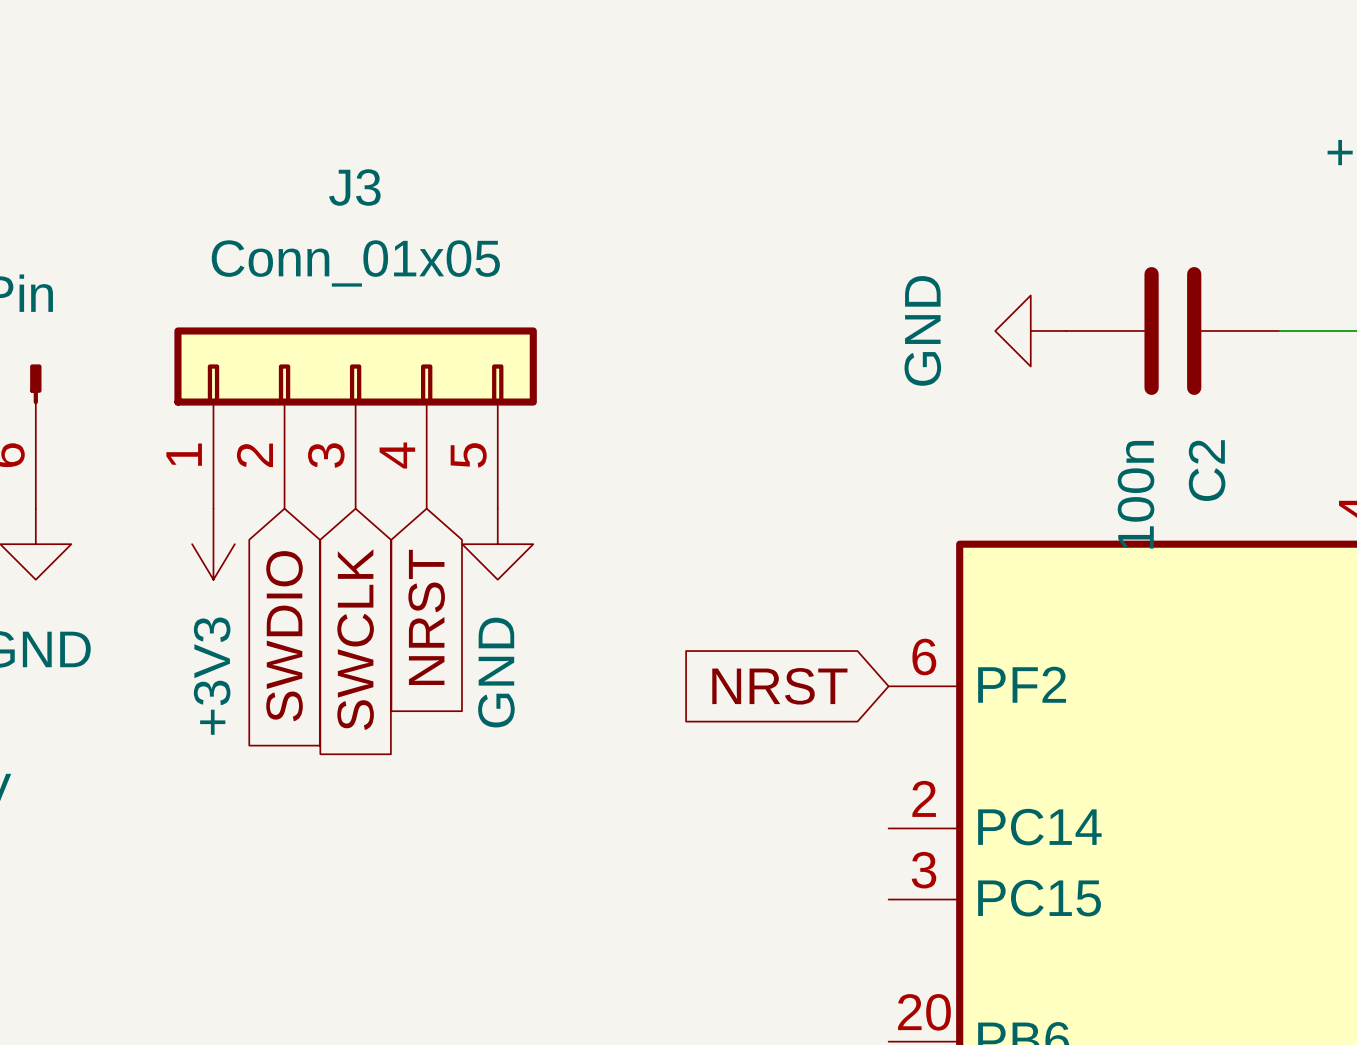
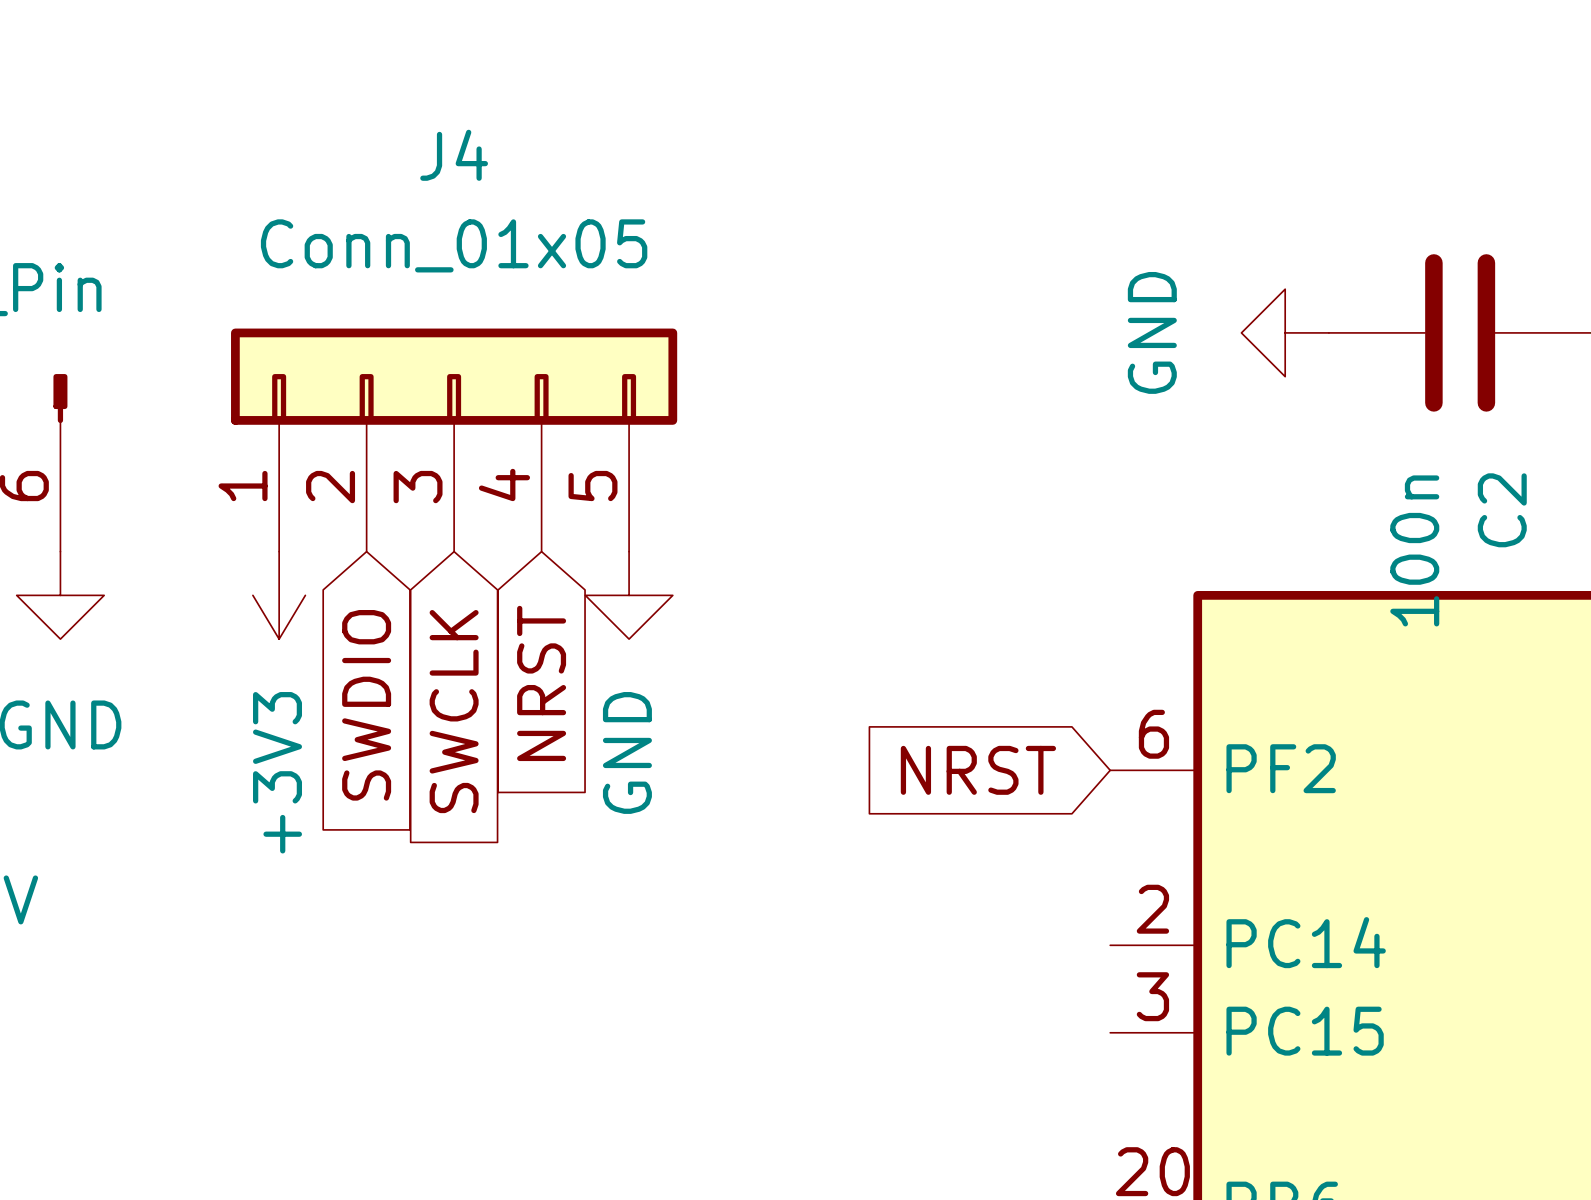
J3 name: J3 (354, 187) -> J4 (454, 155)

